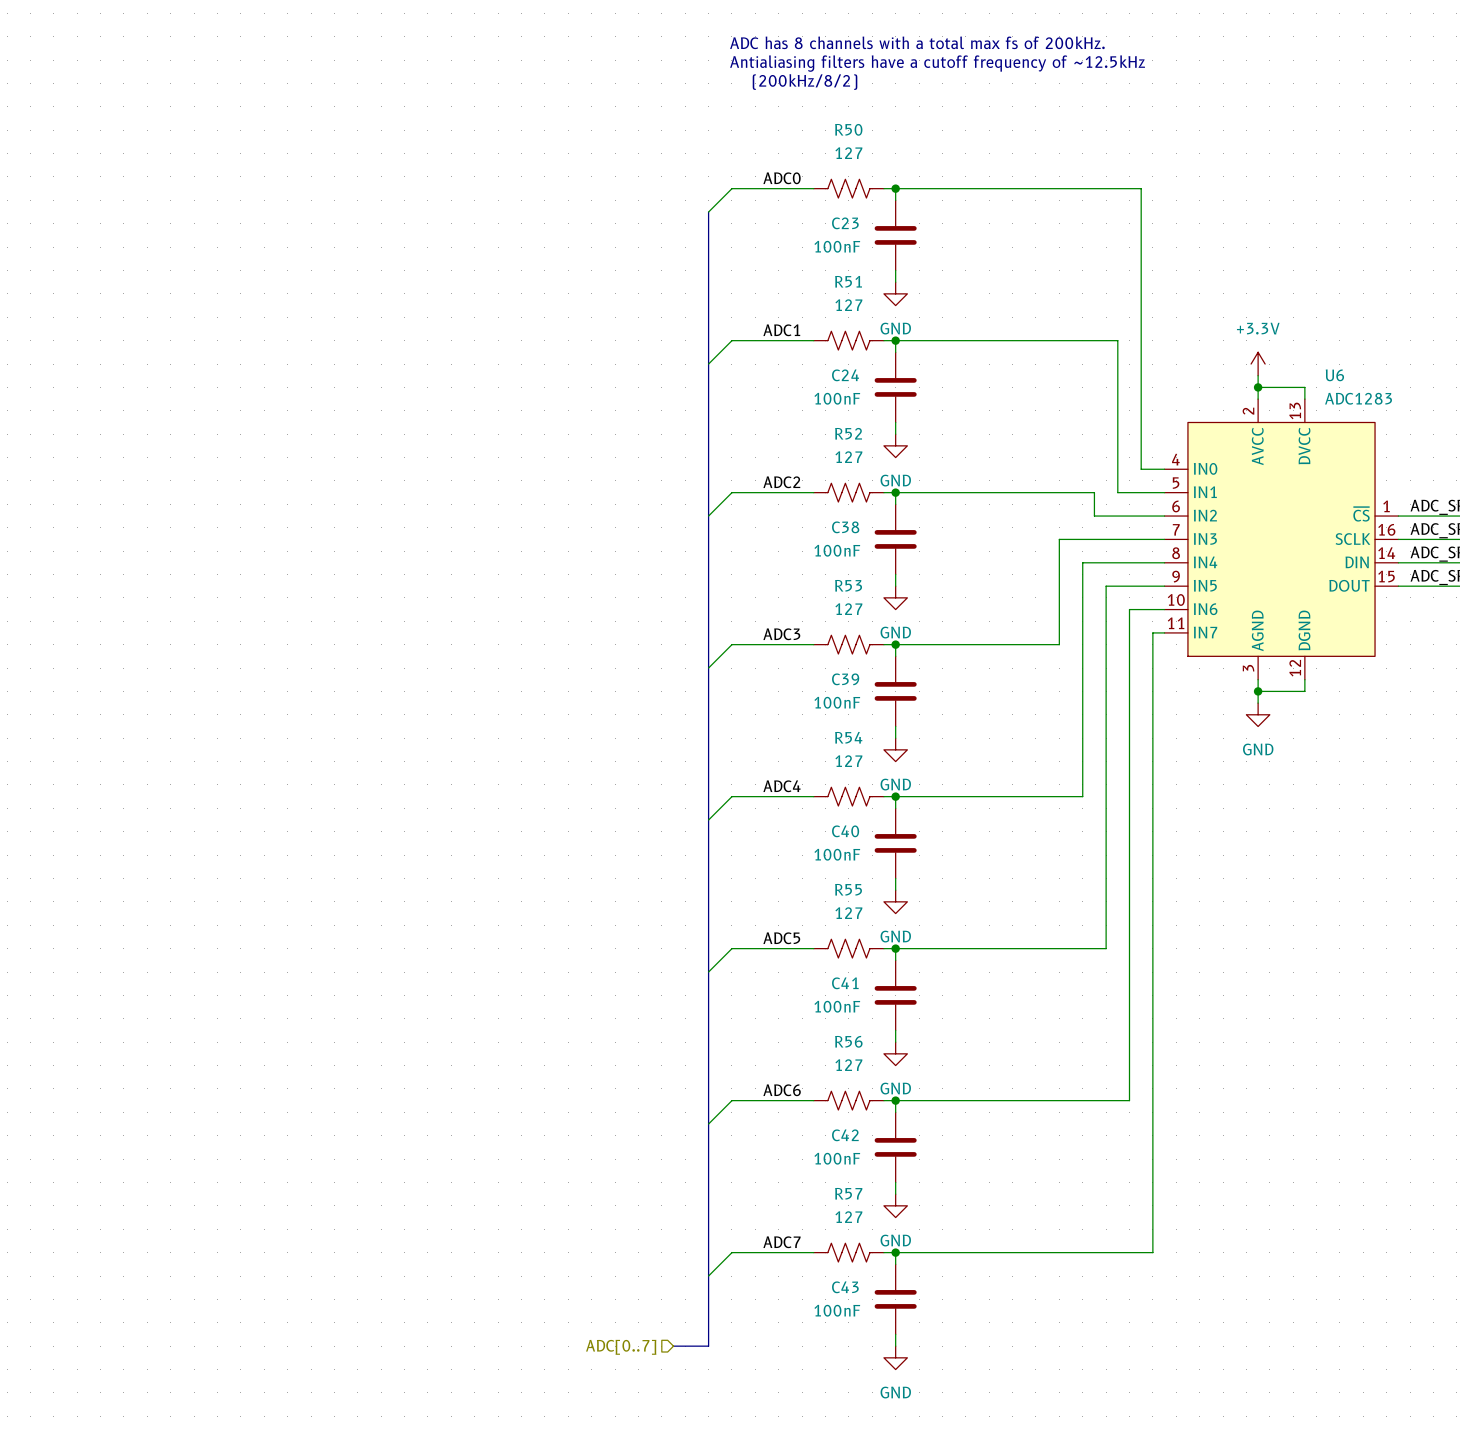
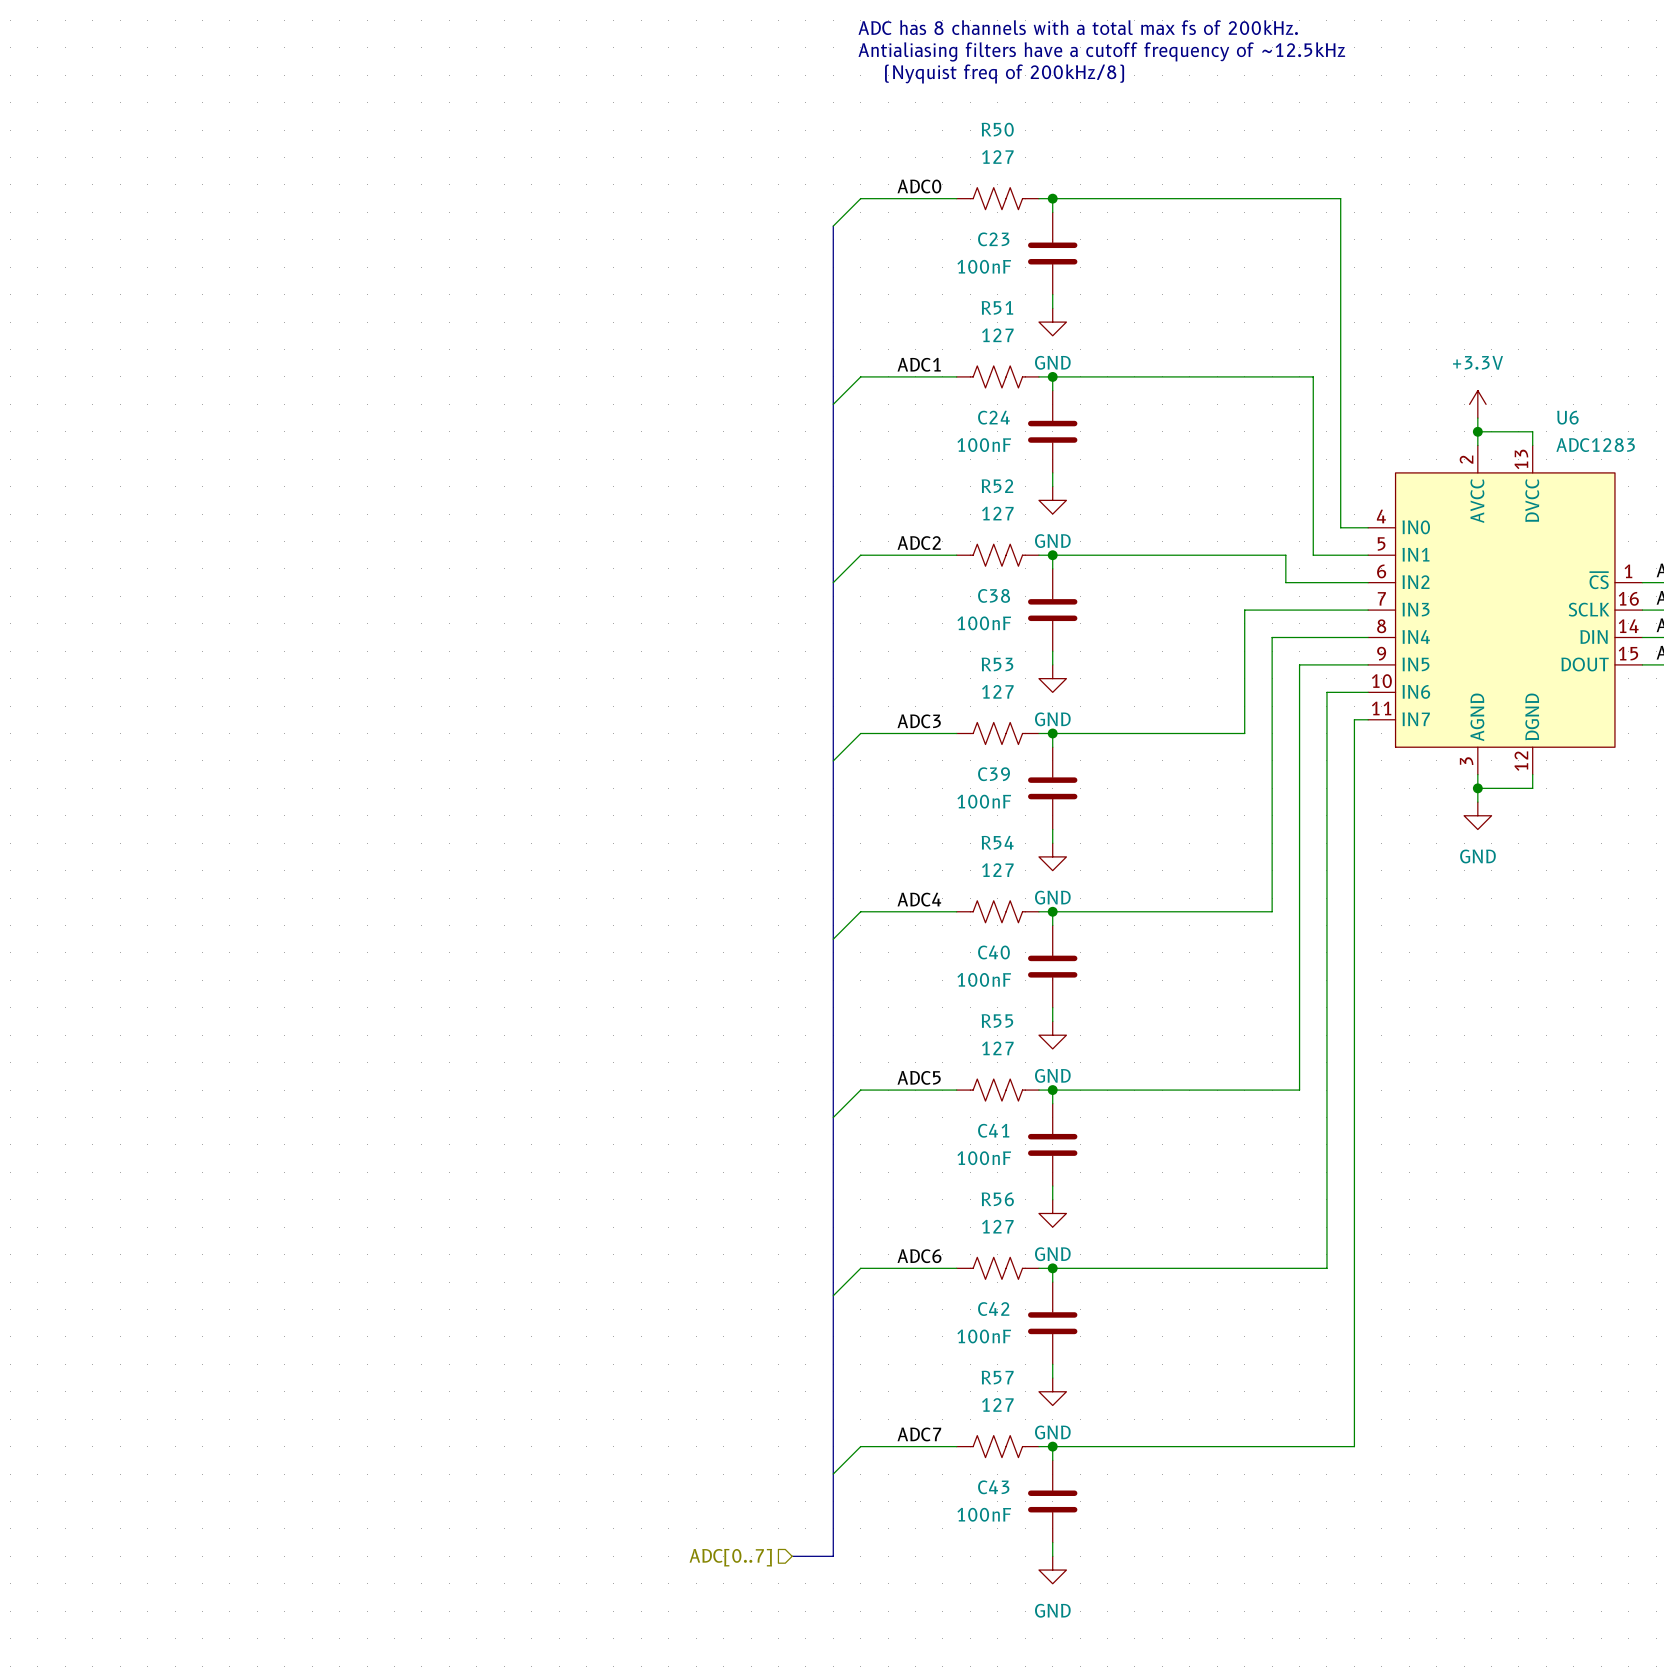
text: (200kHz/8/2) (805, 82) -> (Nyquist freq of 200kHz/8) (1004, 73)

